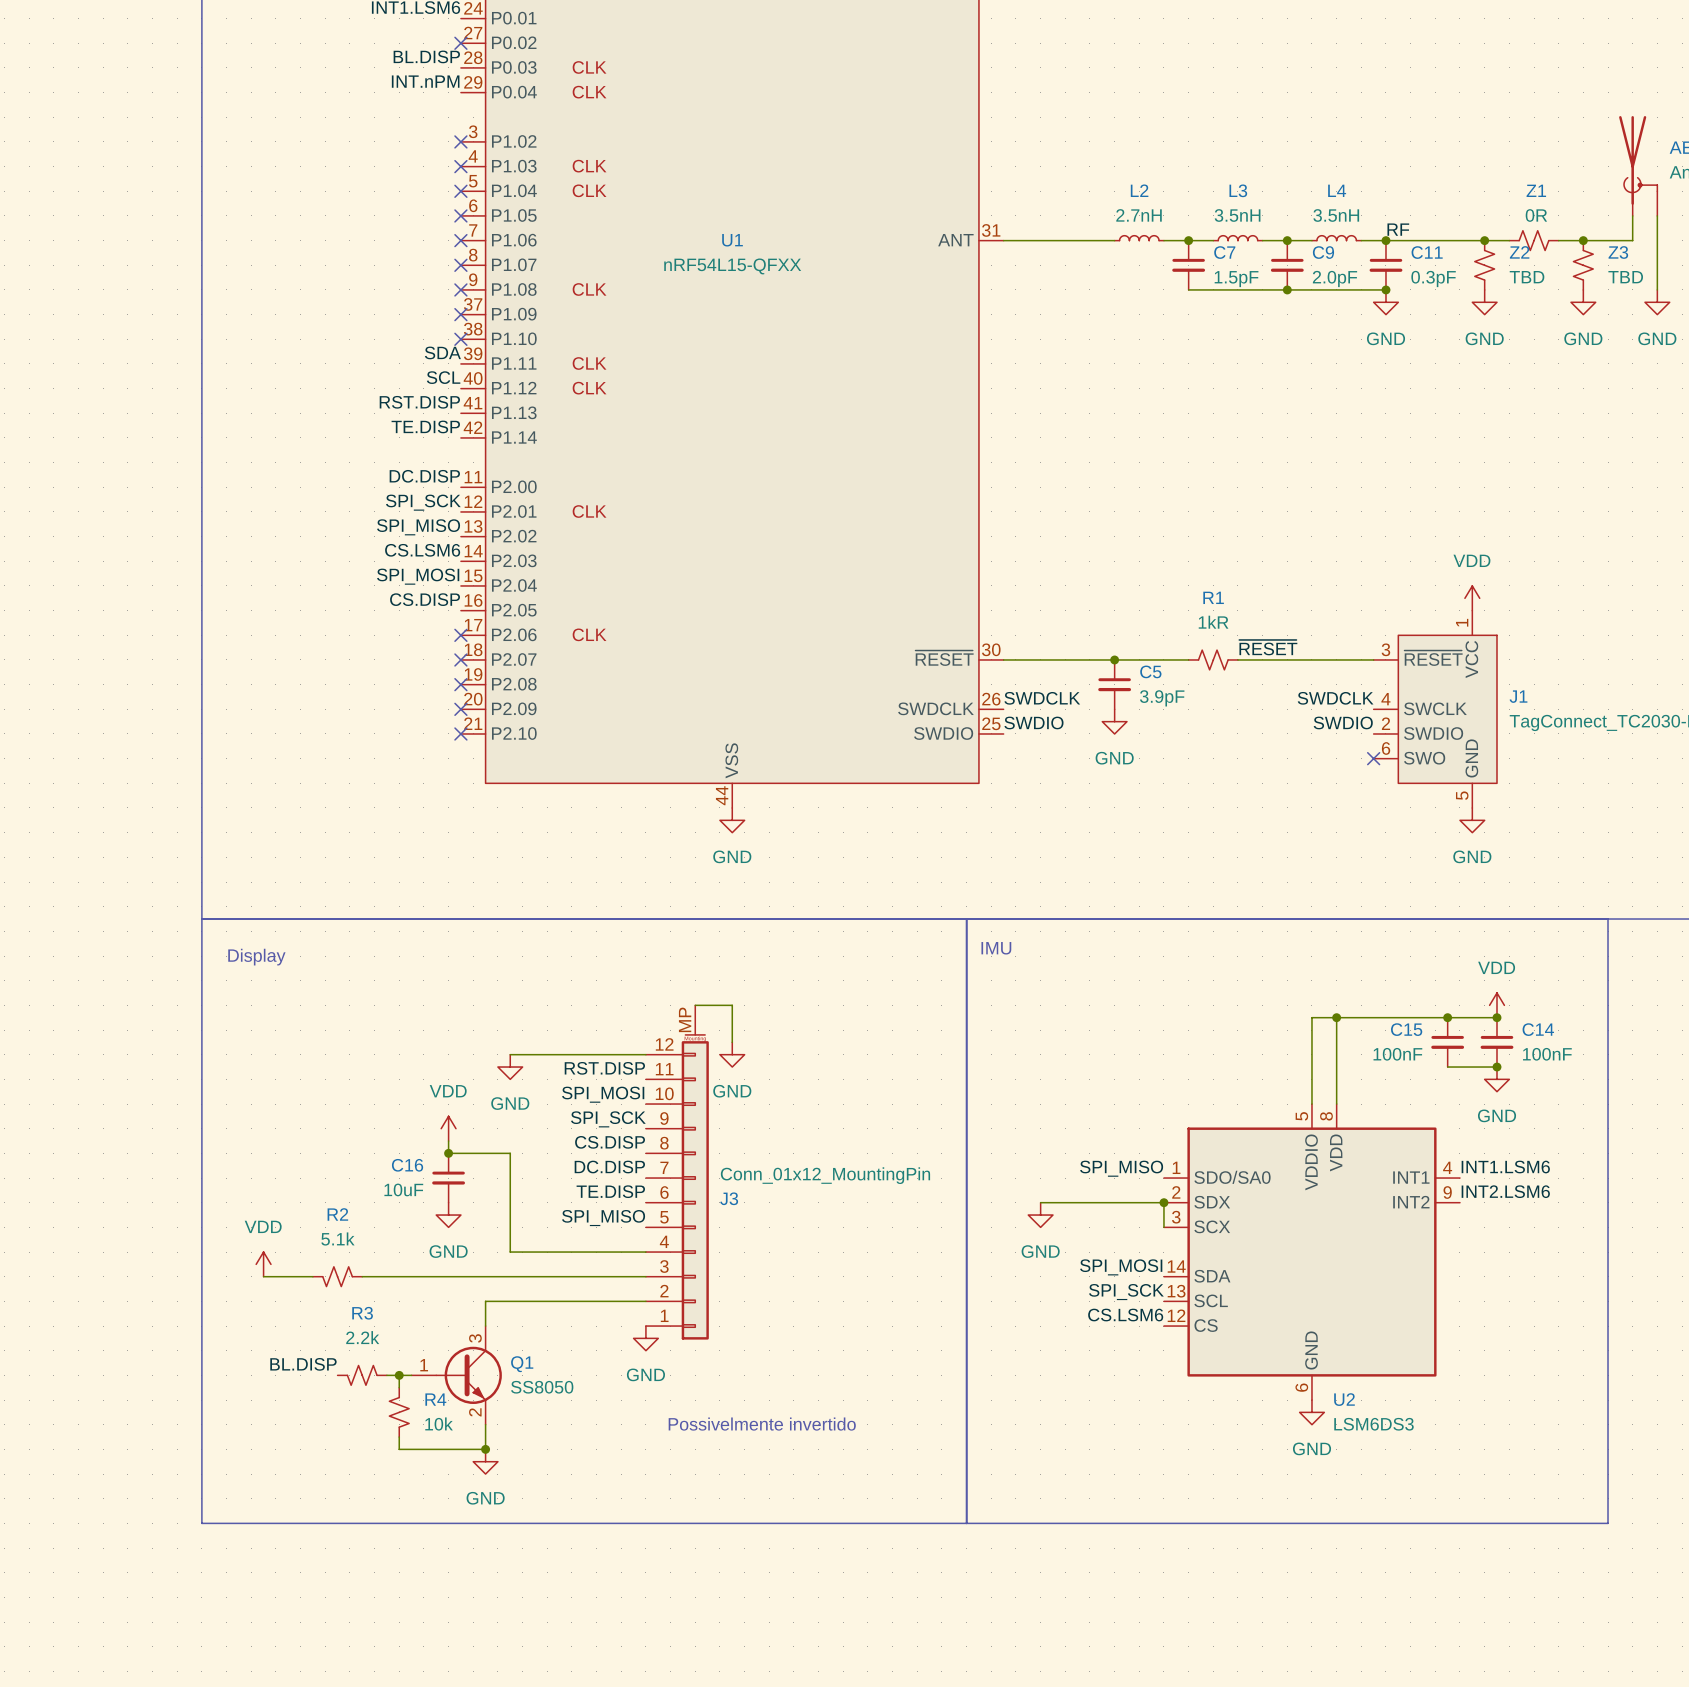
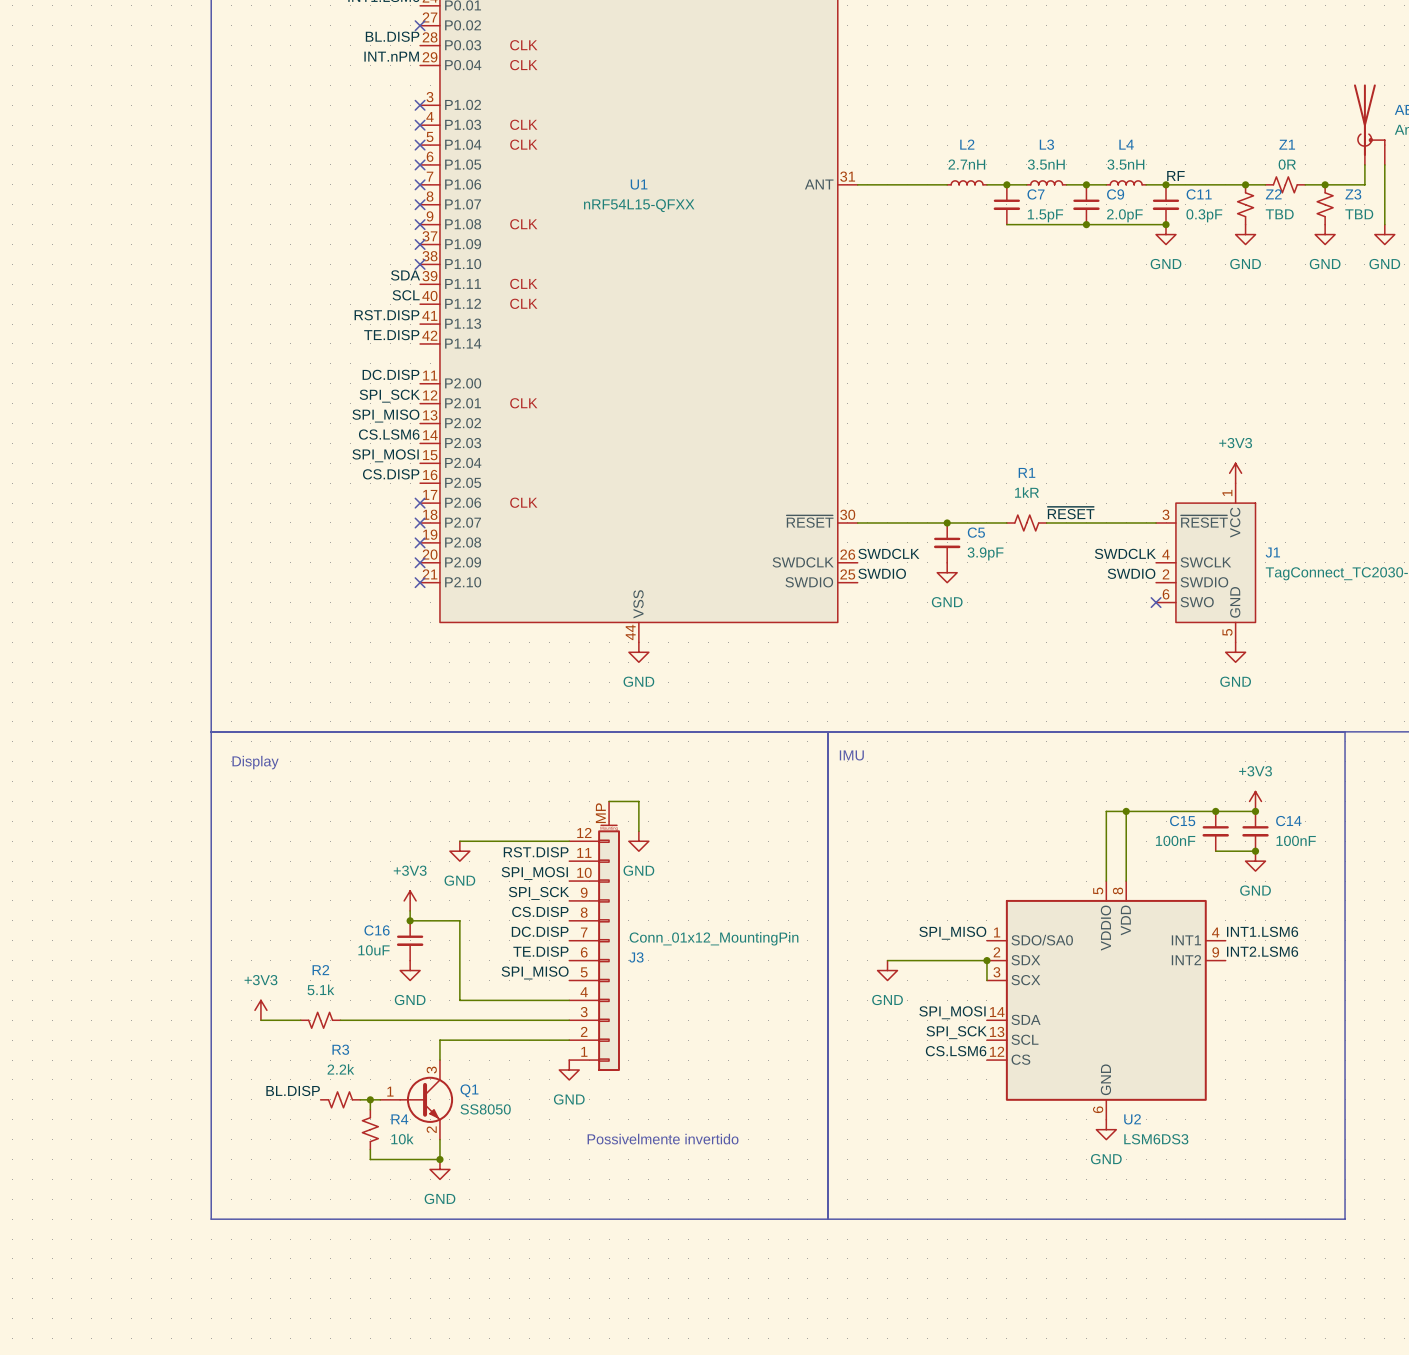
power symbol: VDD (1472, 598) -> +3V3 (1235, 473)
power symbol: VDD (1497, 1005) -> +3V3 (1255, 801)
power symbol: VDD (448, 1128) -> +3V3 (410, 900)
power symbol: VDD (263, 1264) -> +3V3 (260, 1010)

